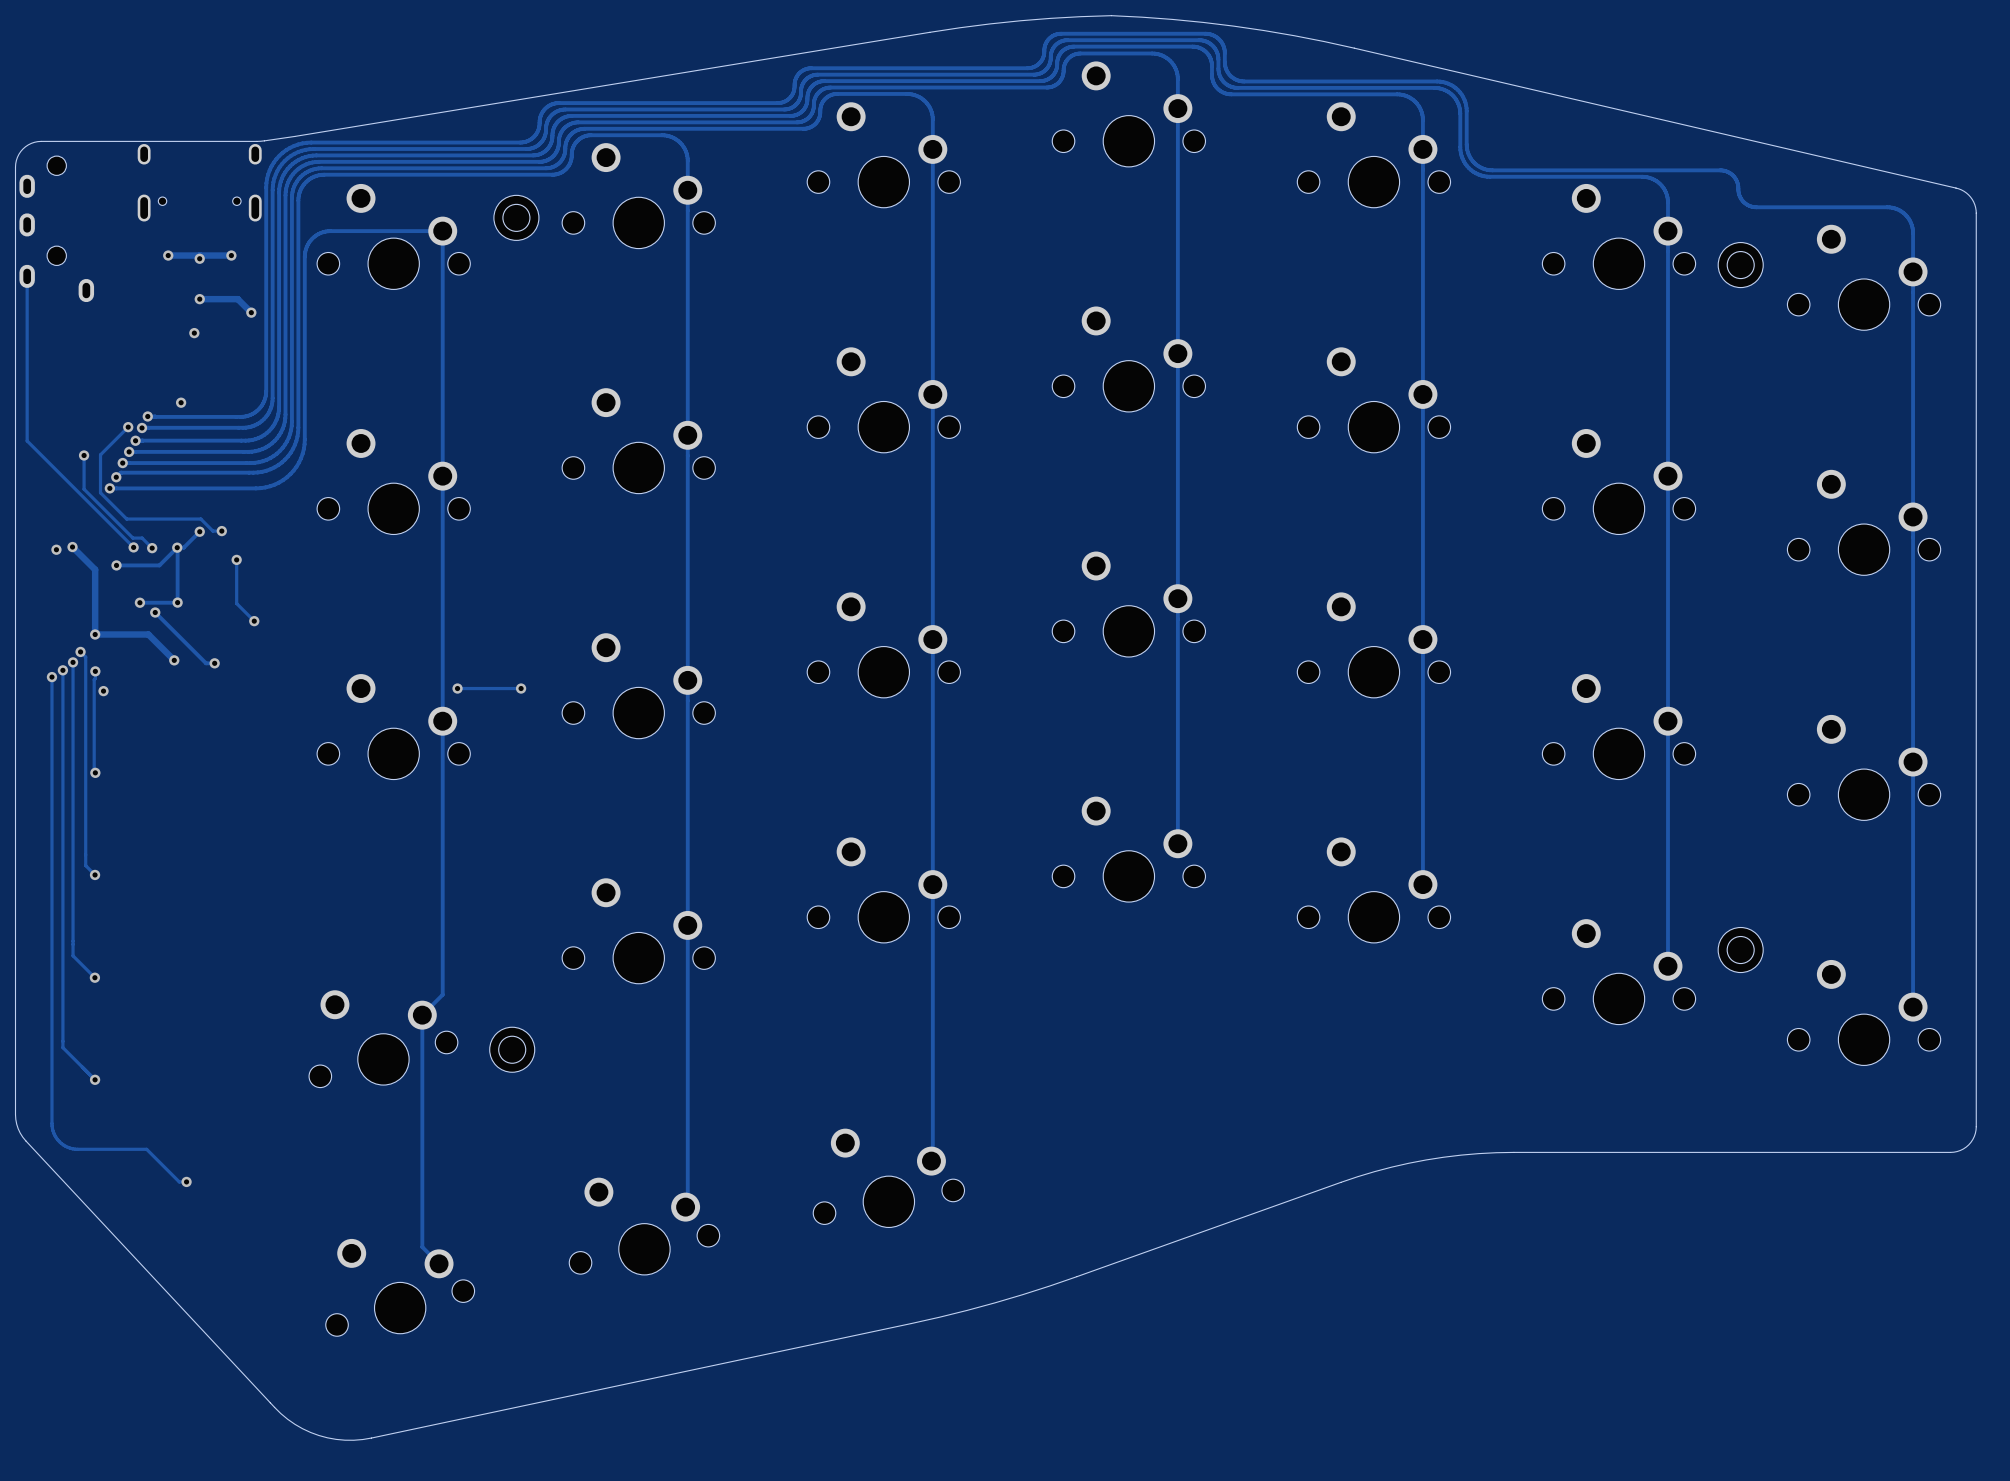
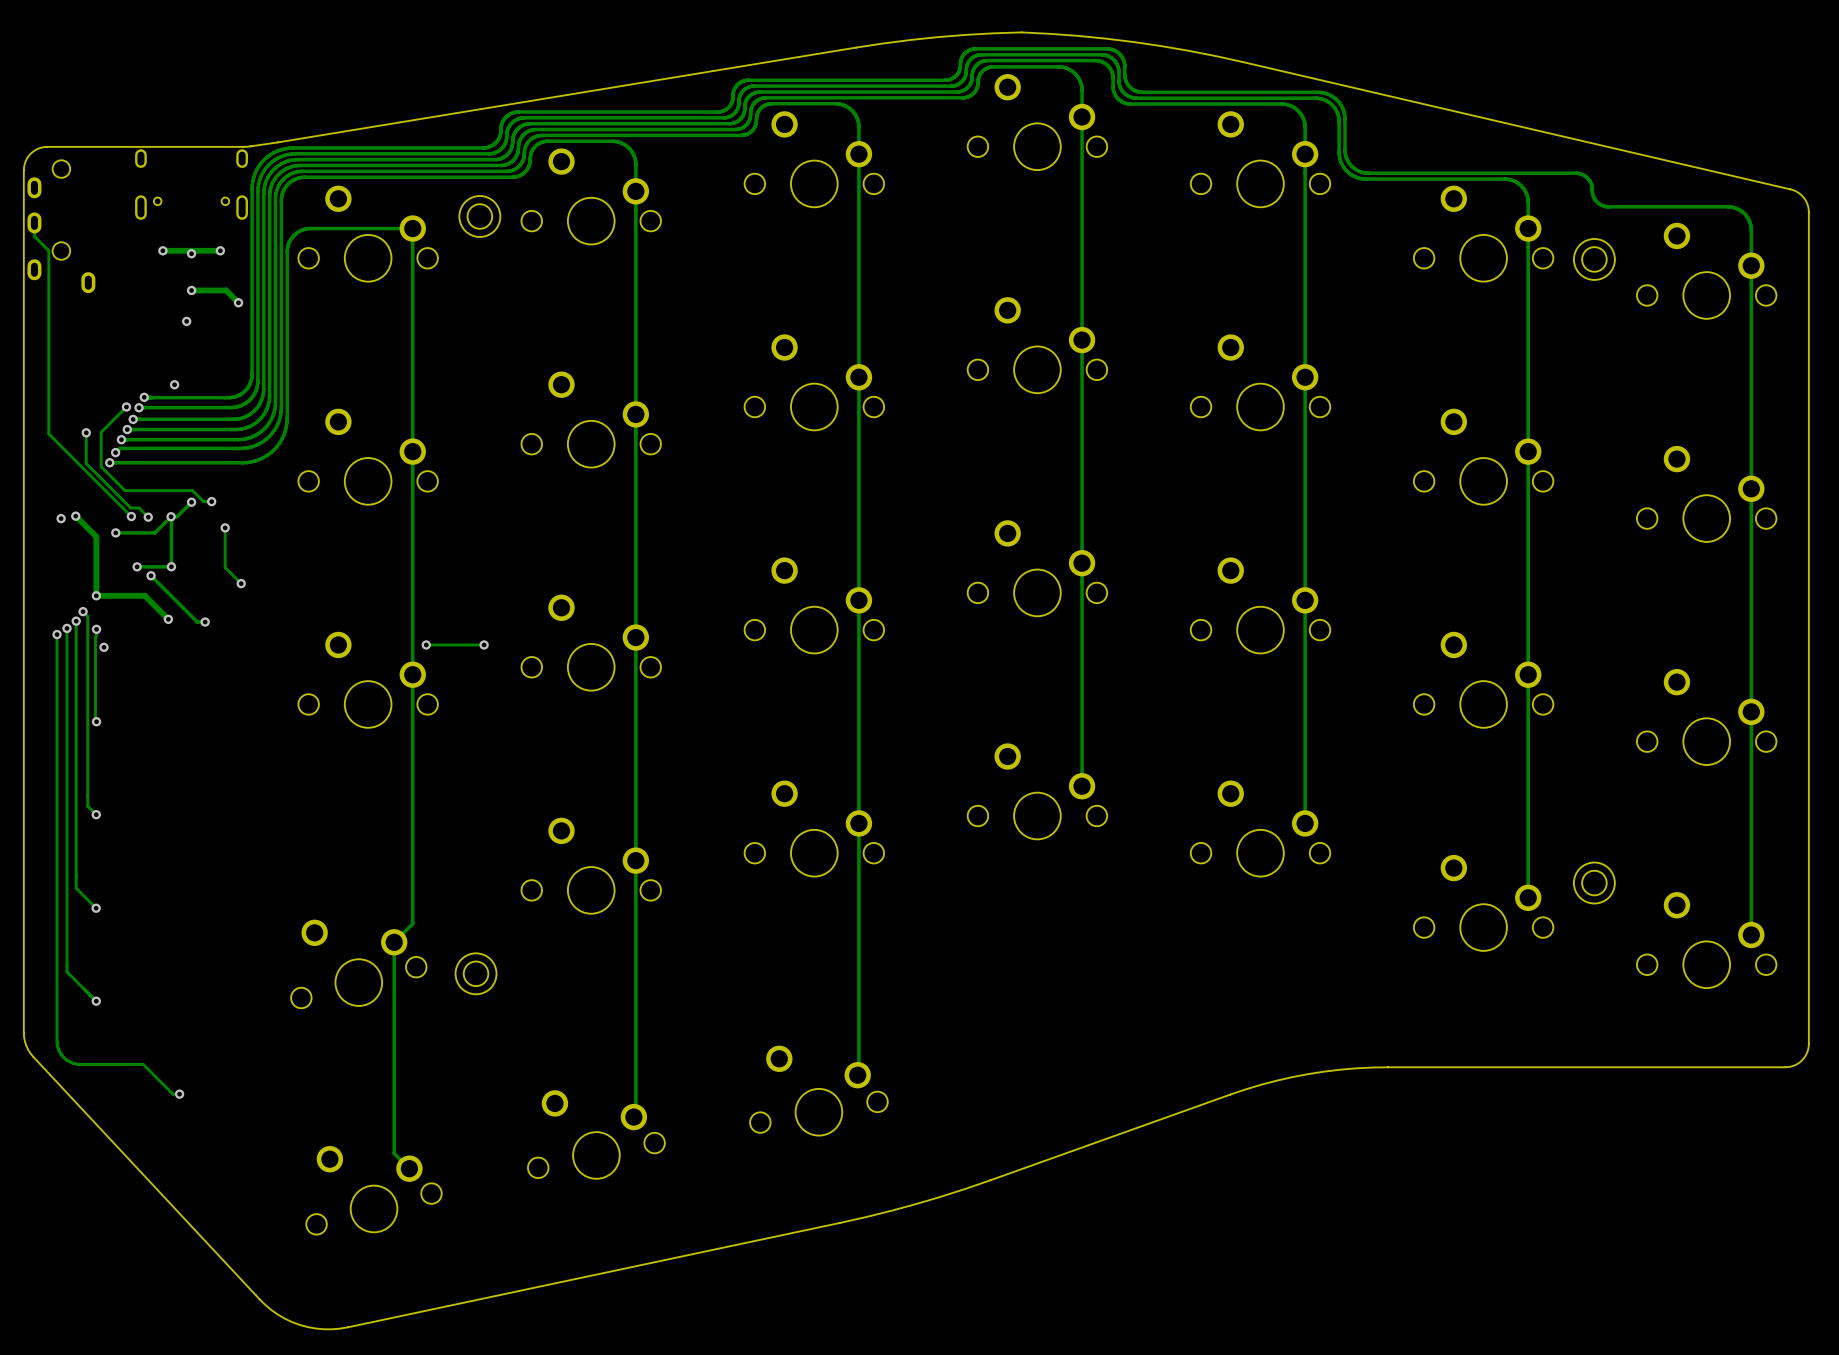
track: (27, 276) (27, 440) (42, 456) -> (34, 222) (34, 236) (48, 250) (48, 433)

